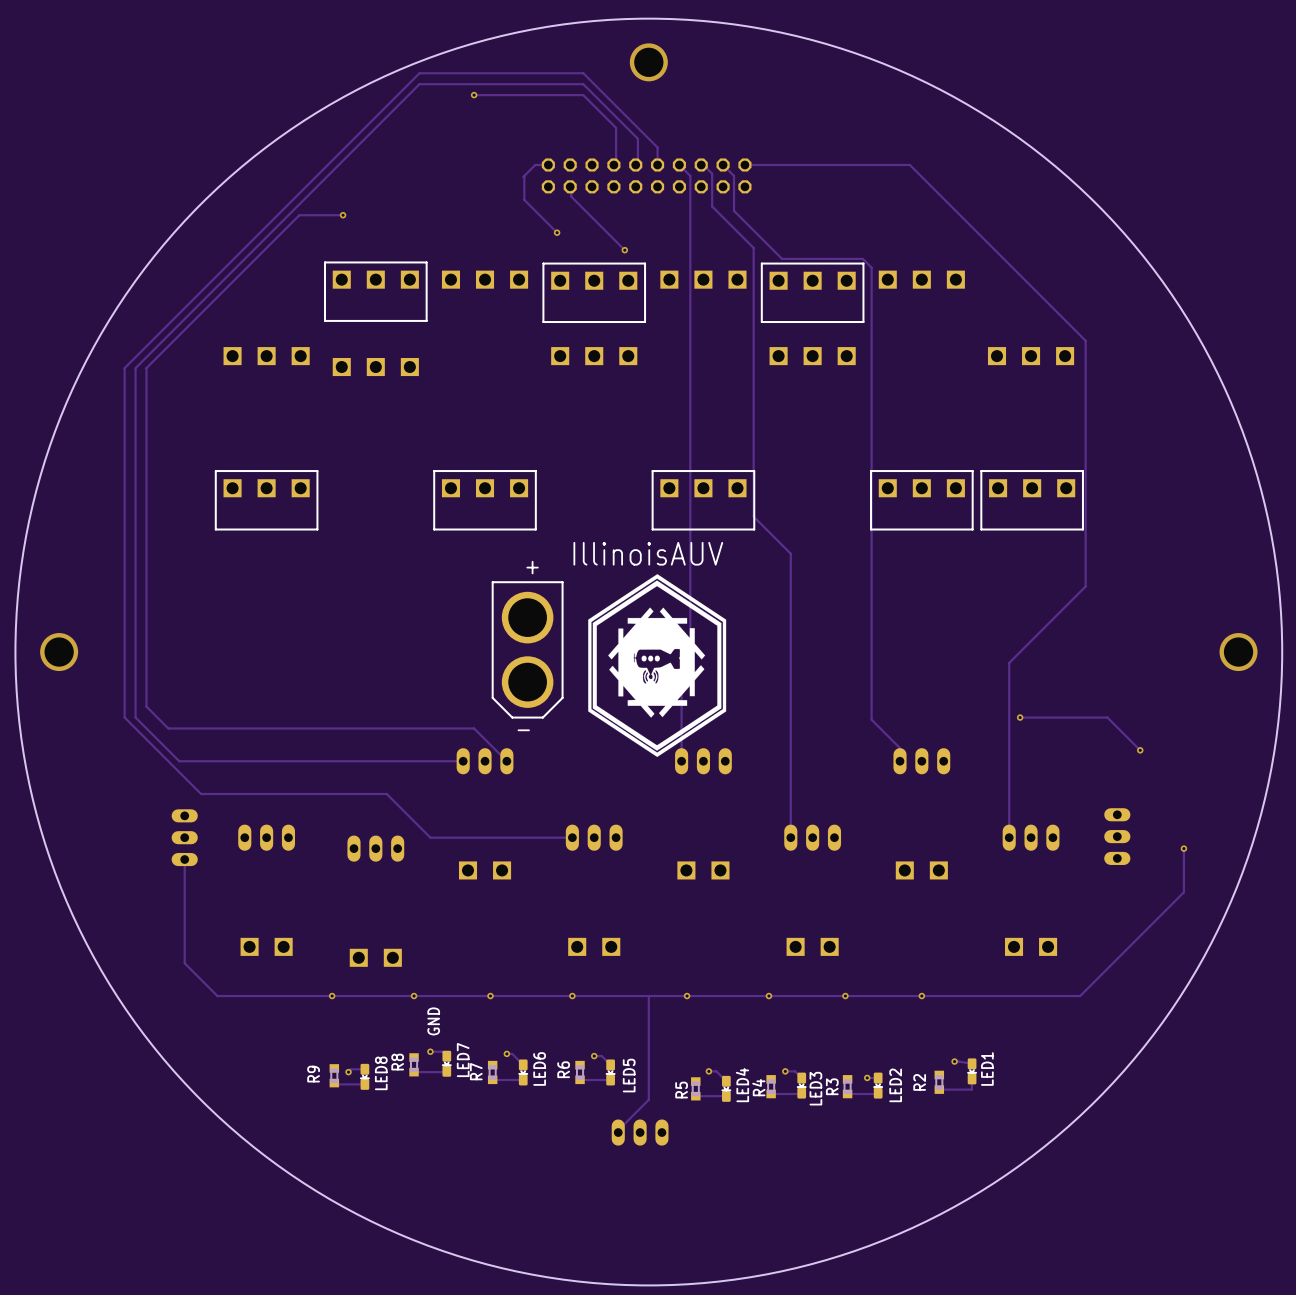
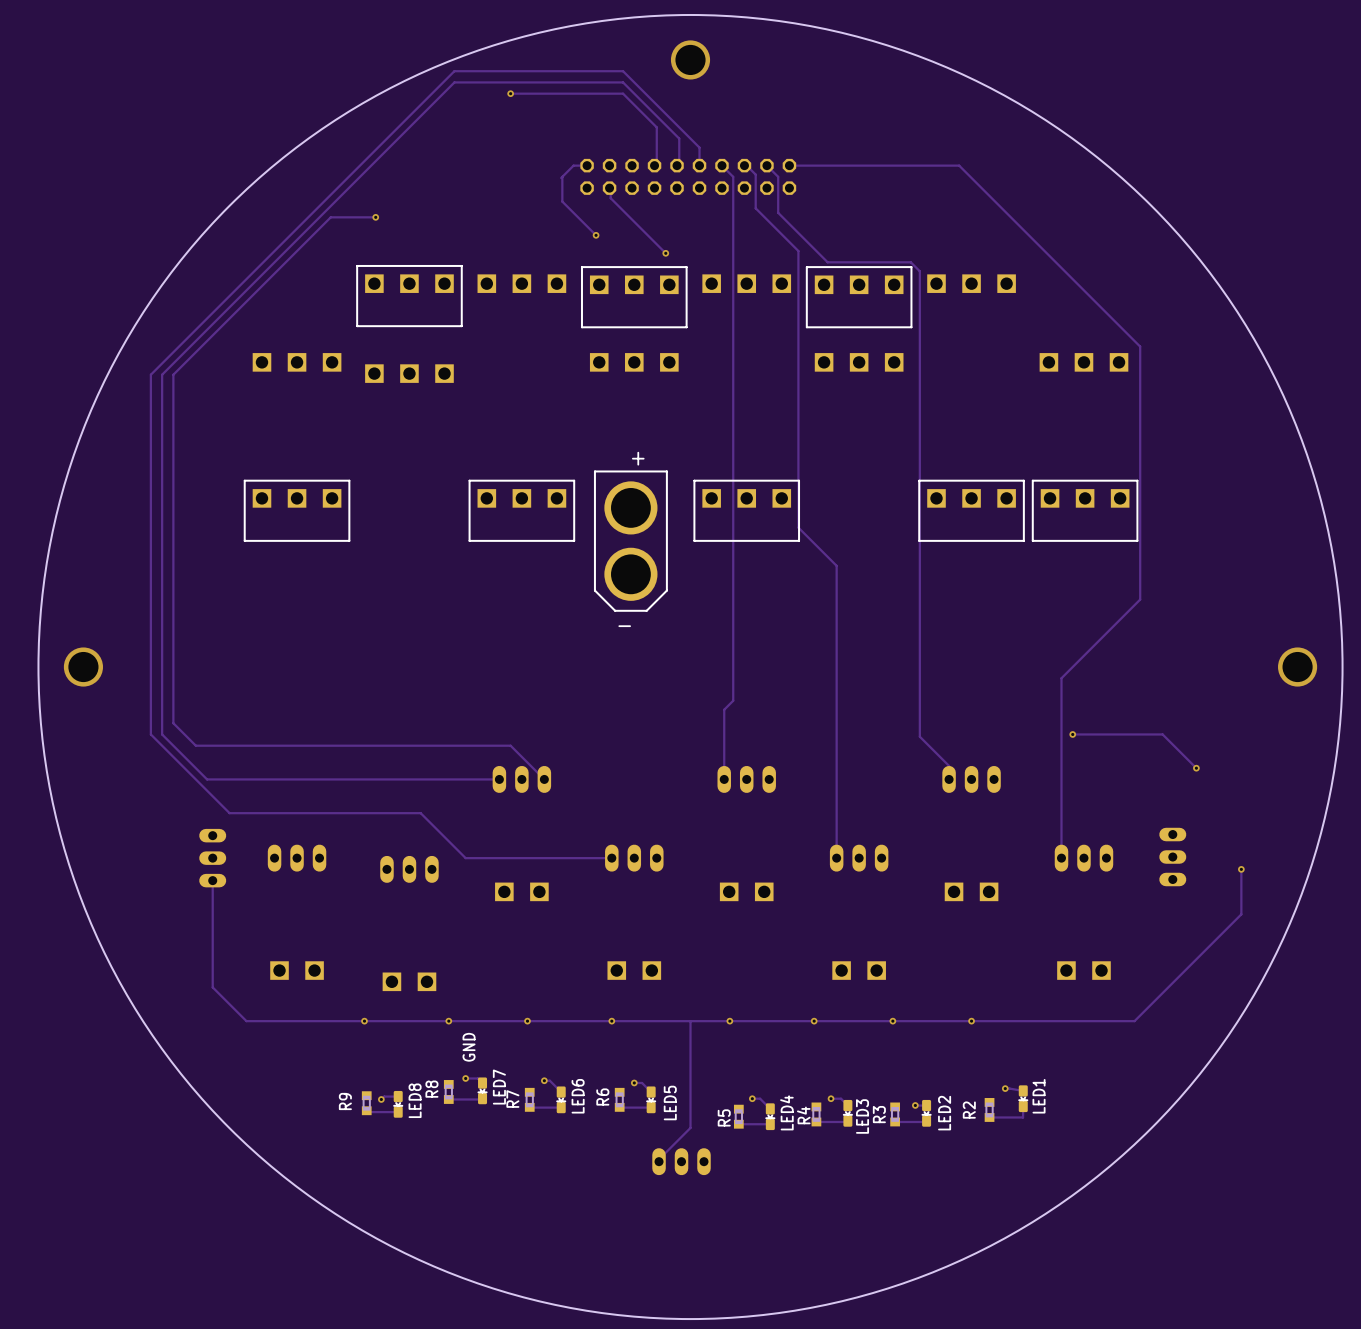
text position: + (532, 567) -> + (638, 458)
drawing: [588, 574, 727, 758] -> none
part position: (527, 649) -> (630, 541)
text position: - (523, 730) -> - (624, 626)

